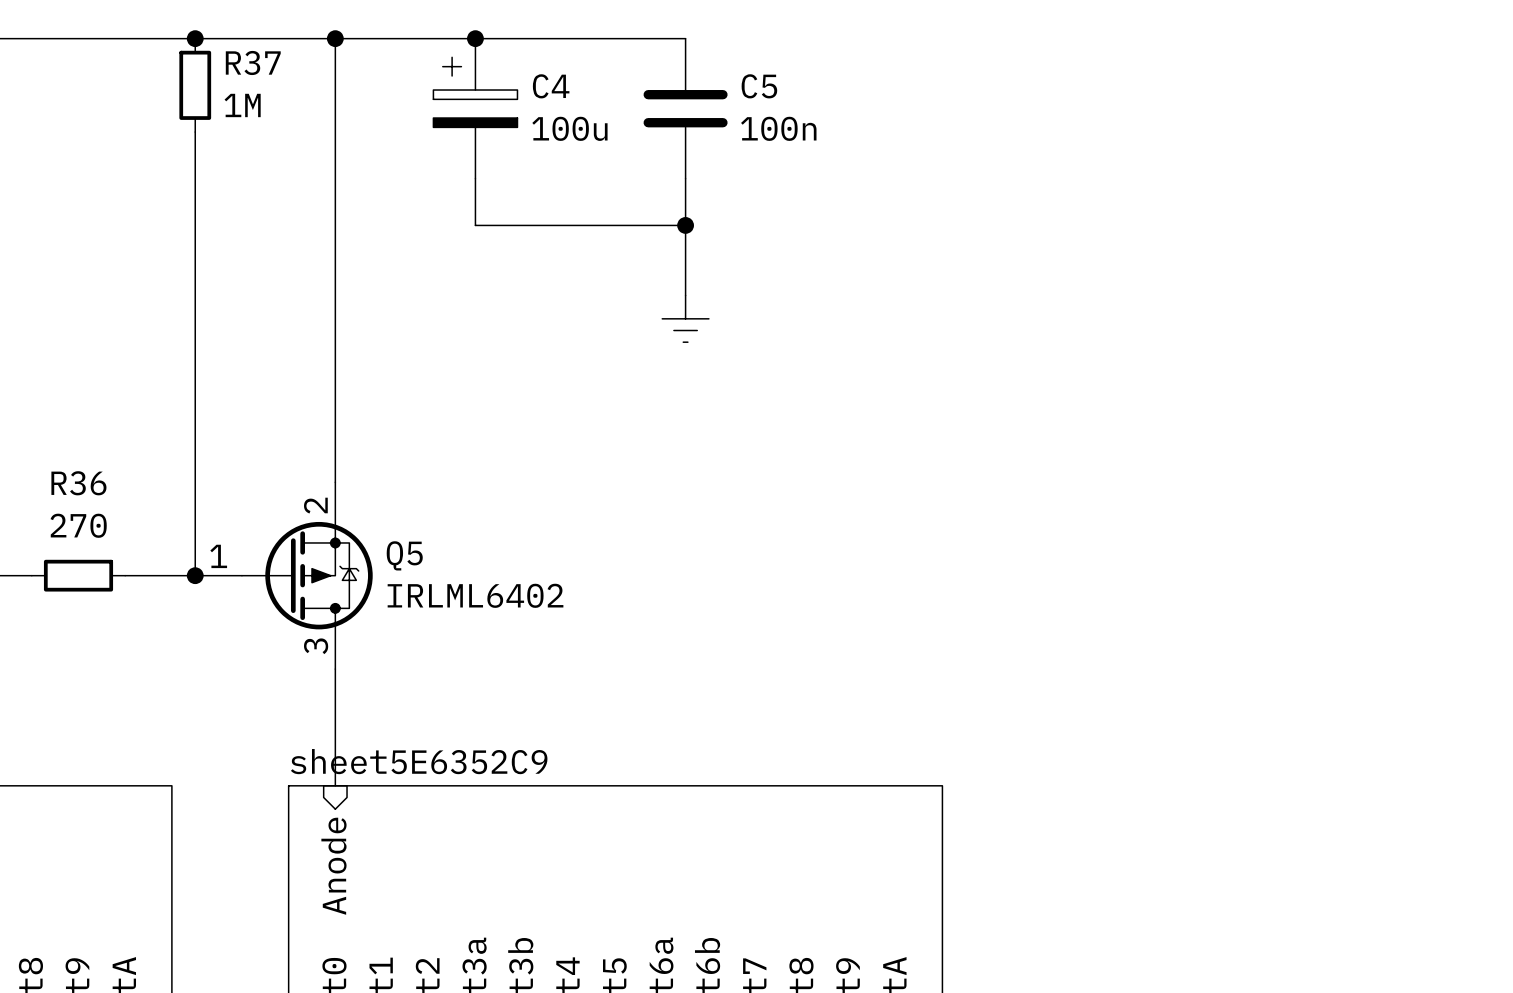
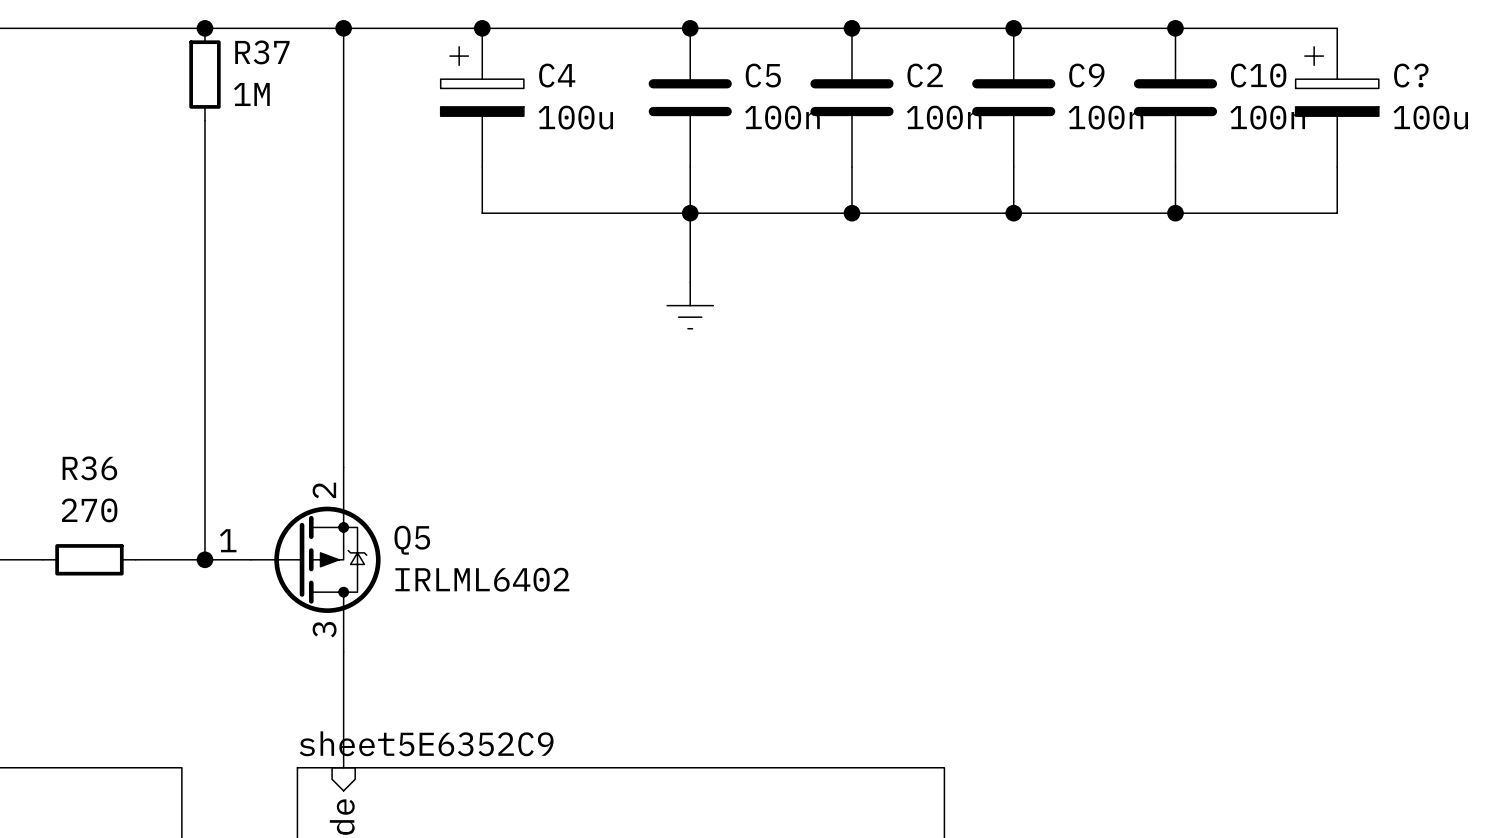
wire: none -> (690, 28) (1337, 28)
junction: none -> (690, 28)
junction: none -> (851, 28)
junction: none -> (1013, 28)
junction: none -> (1175, 28)
C2: none -> 100n (851, 97)
C9: none -> 100n (1013, 97)
C10: none -> 100n (1175, 97)
C?: none -> 100u (1337, 97)
wire: none -> (851, 166) (851, 213)
wire: none -> (1013, 166) (1013, 213)
wire: none -> (1175, 166) (1175, 213)
wire: none -> (1337, 166) (1337, 213) (690, 213)
junction: none -> (851, 213)
junction: none -> (1013, 213)
junction: none -> (1175, 213)

